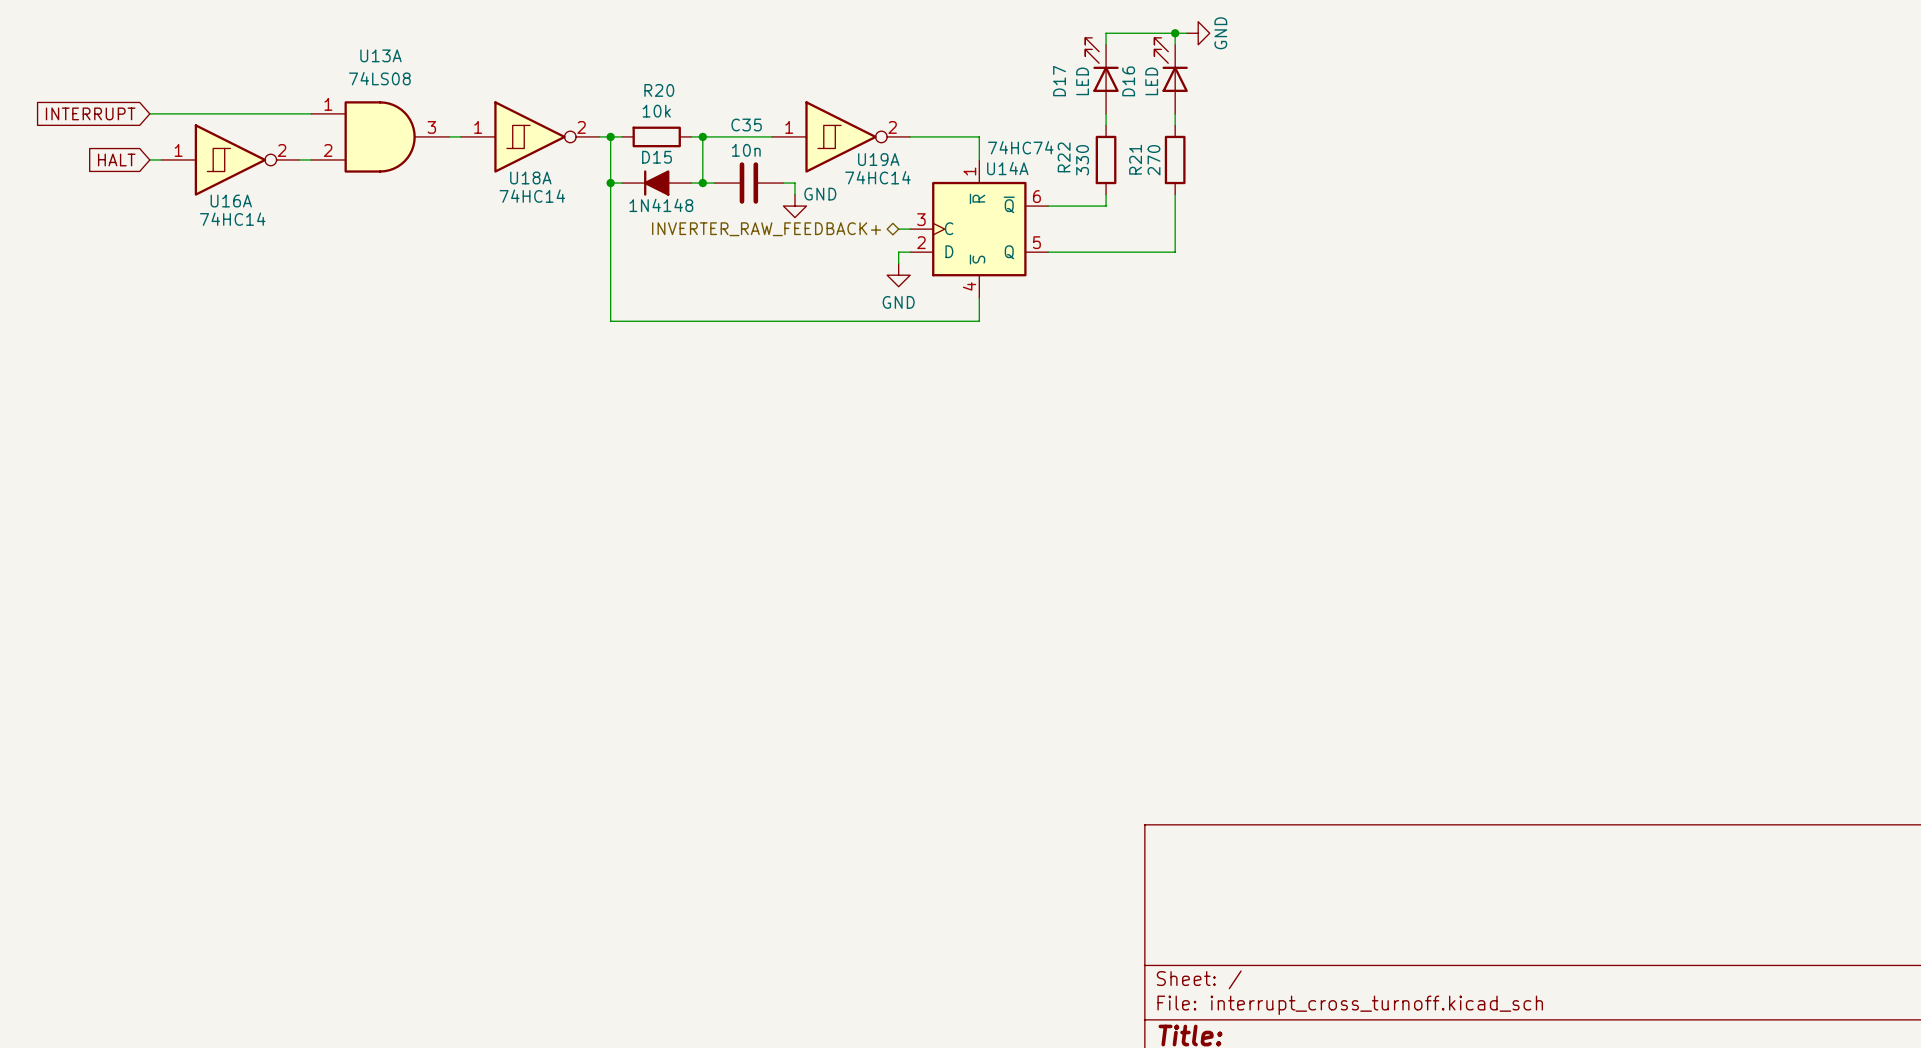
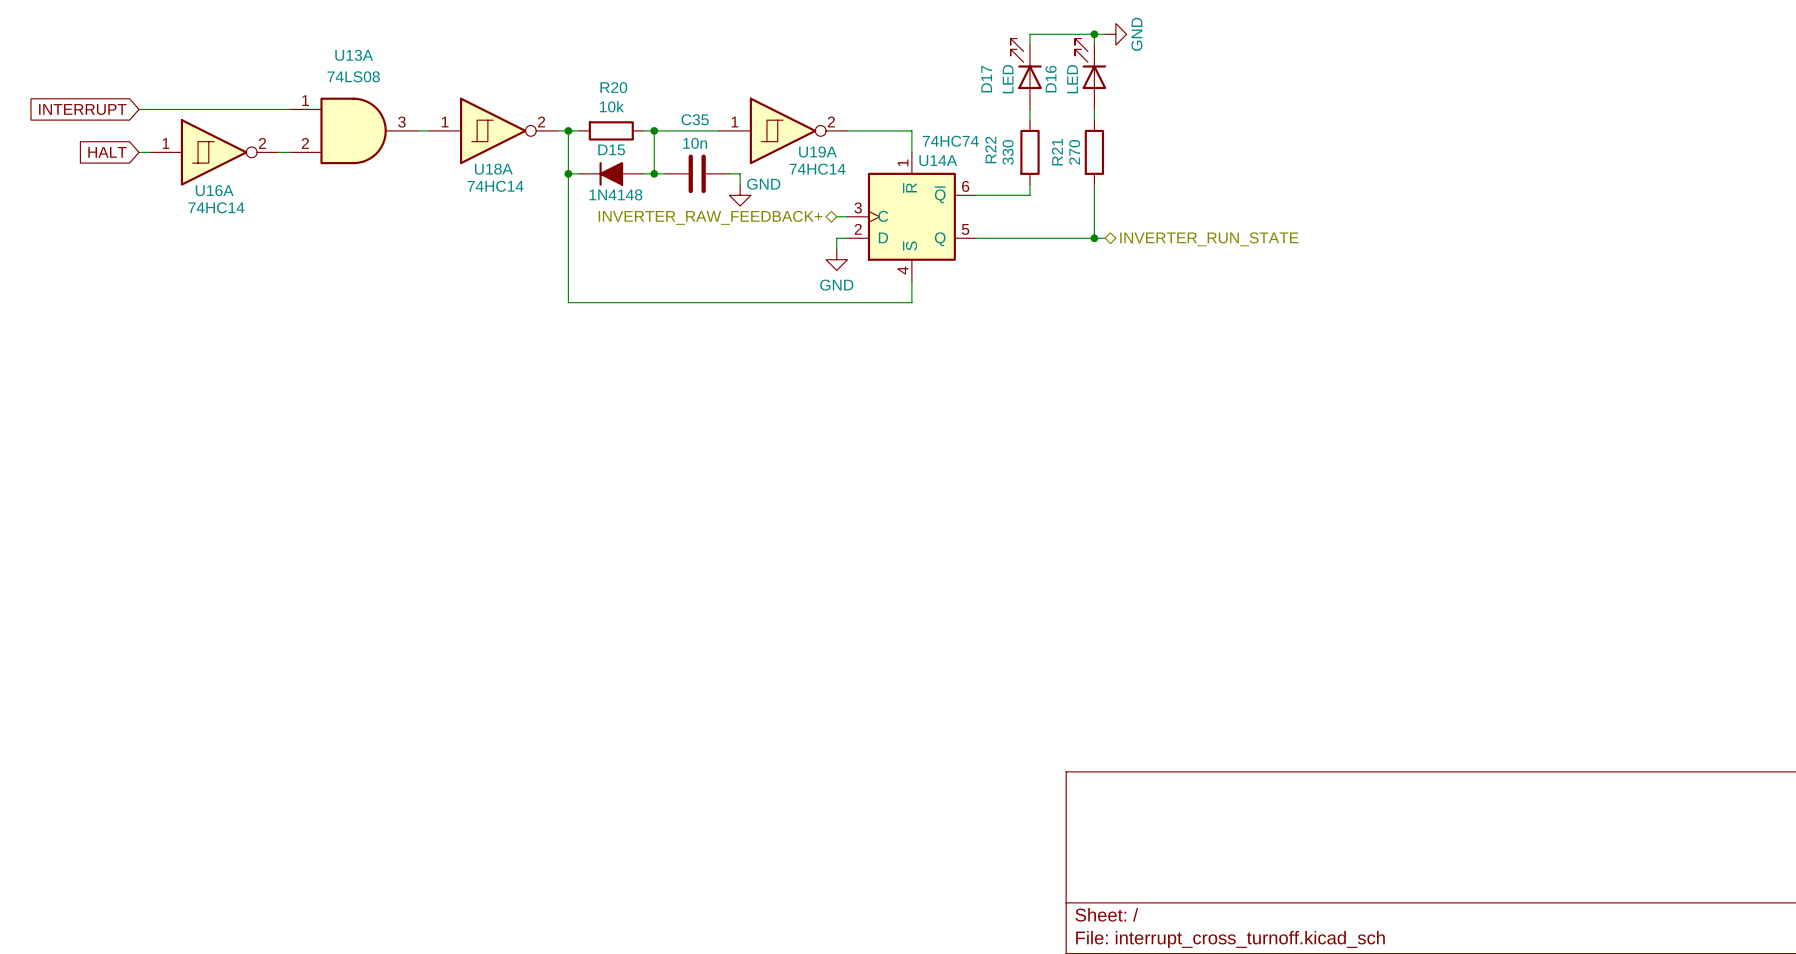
wire: none -> (1094, 238) (1105, 238)
junction: none -> (1094, 238)
hierarchical label: none -> INVERTER_RUN_STATE (1209, 239)

